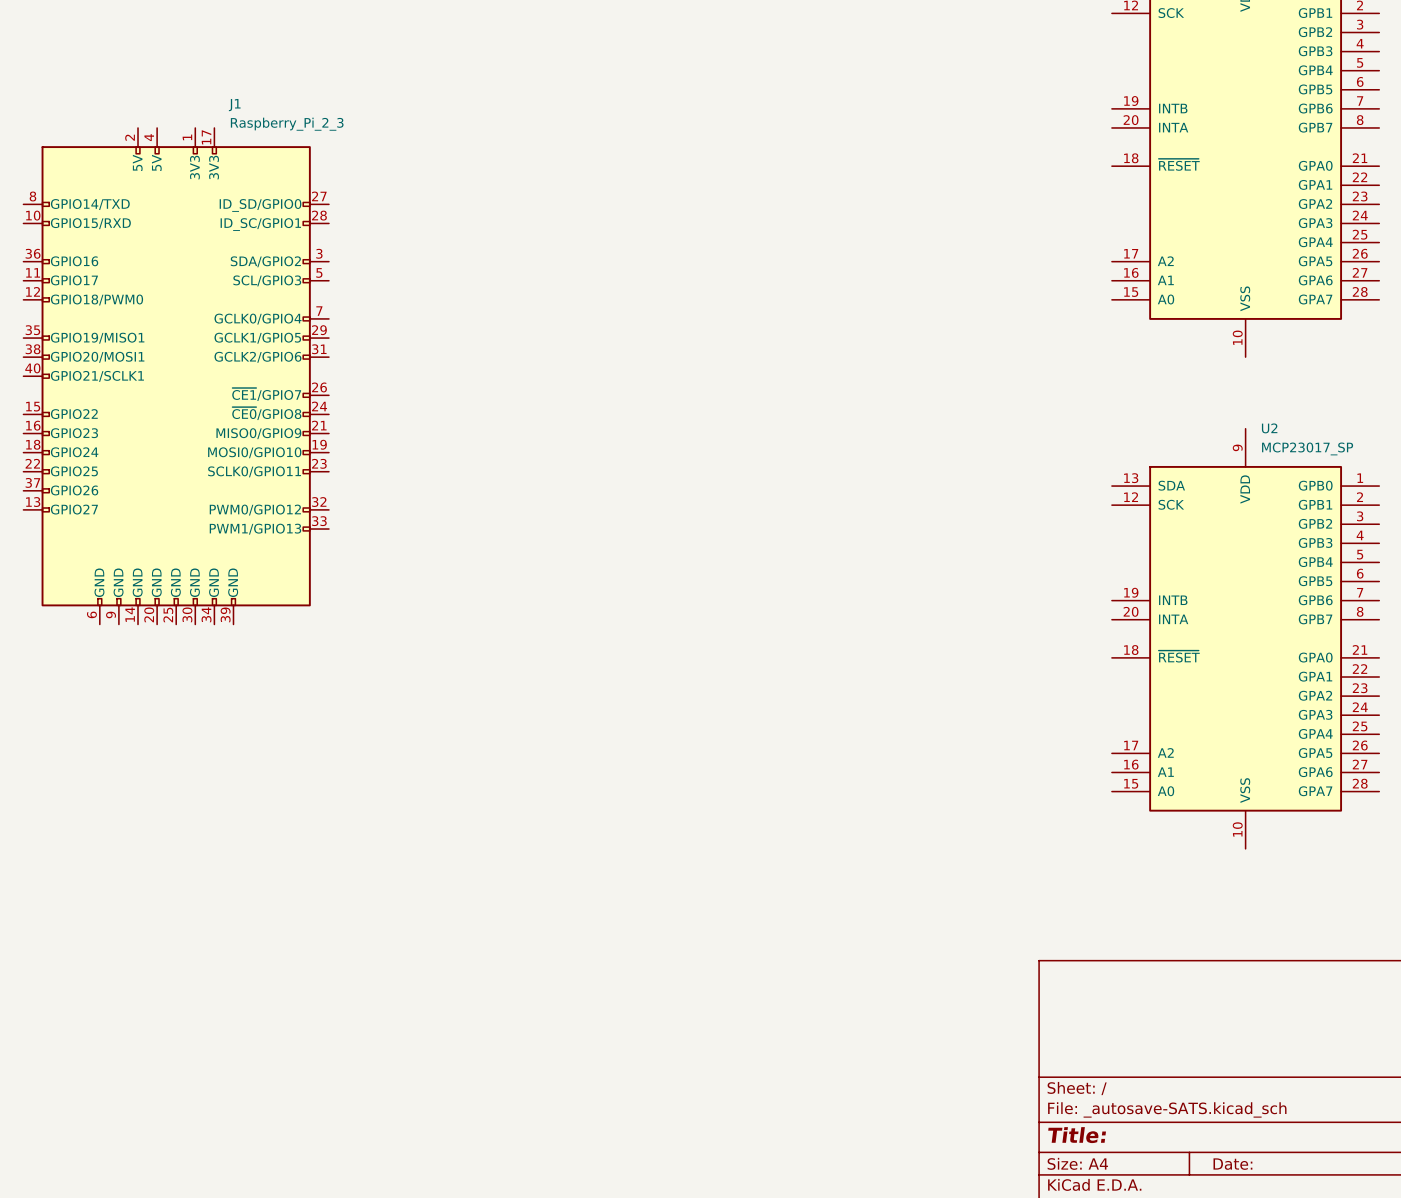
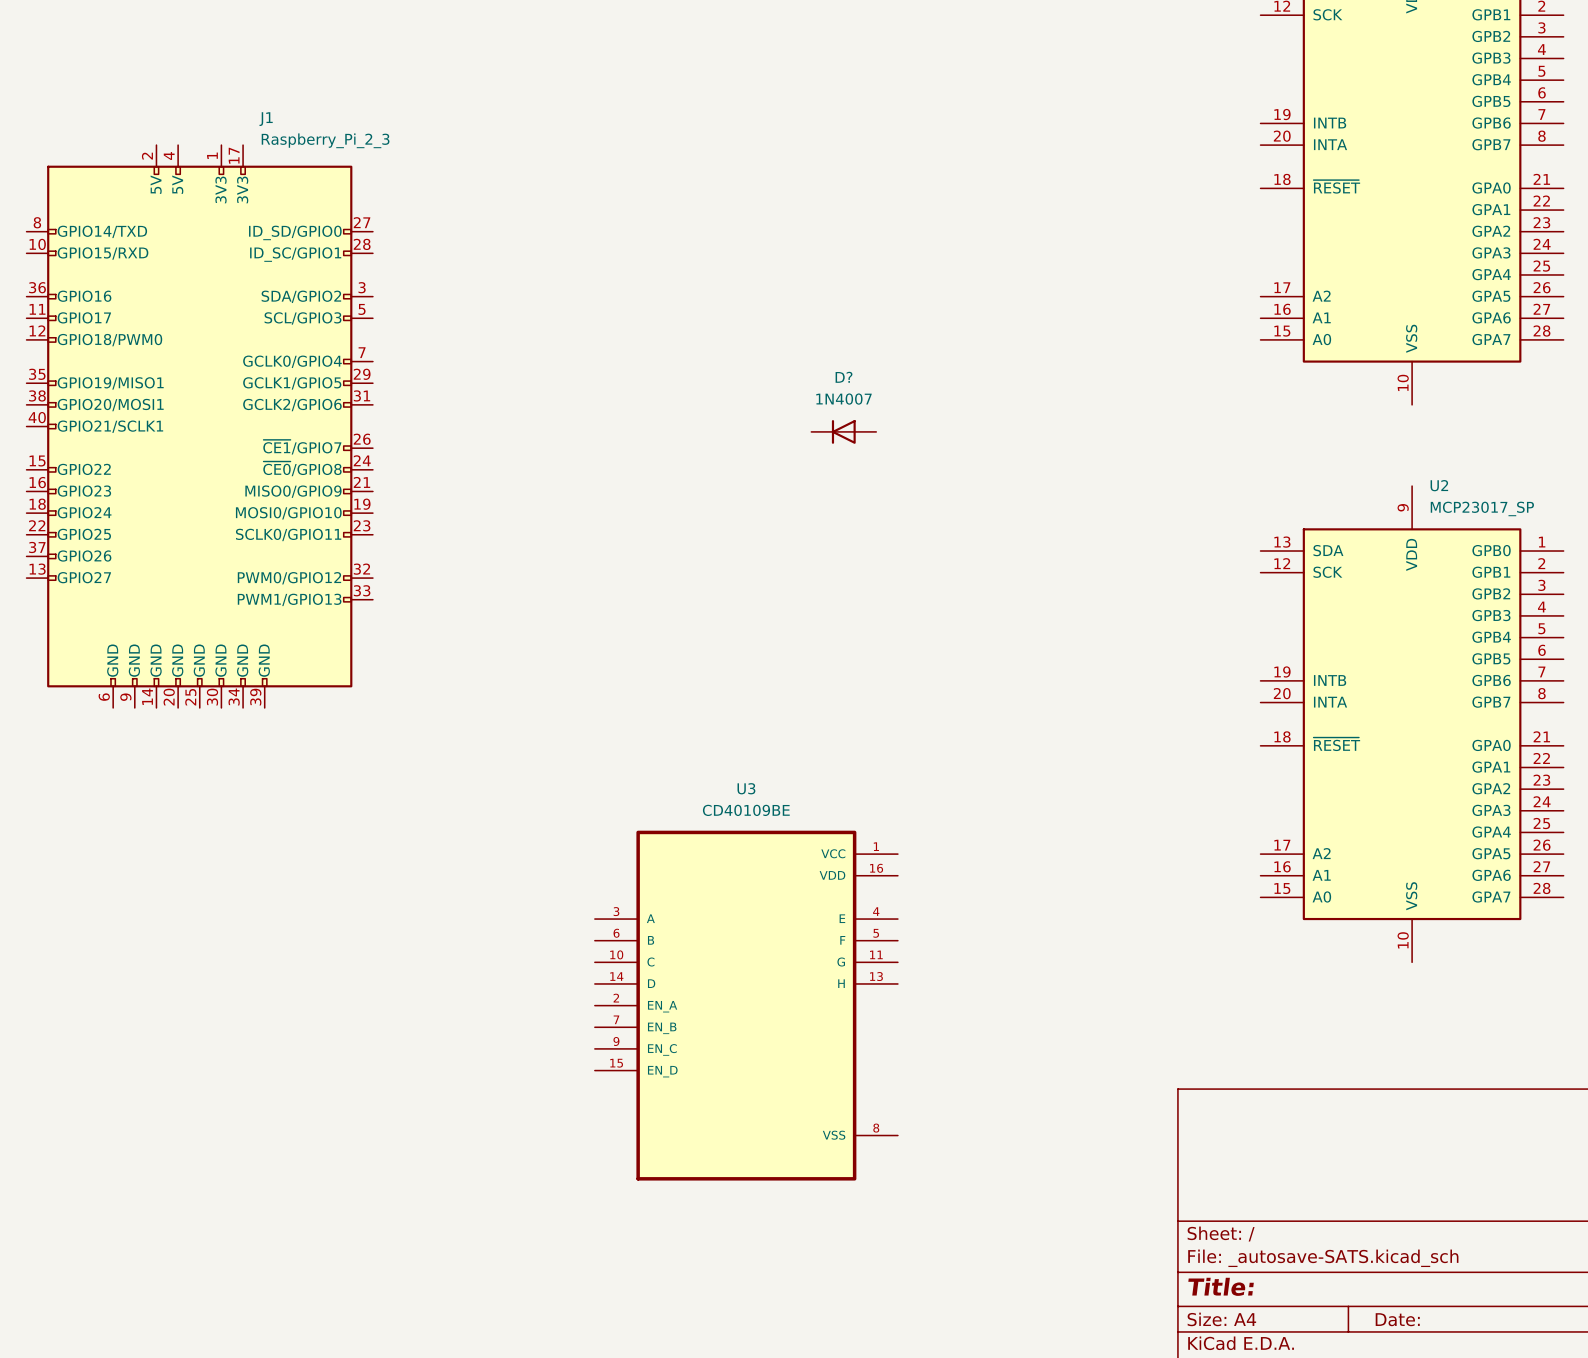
D?: none -> 1N4007 (843, 431)
U3: none -> CD40109BE (746, 1005)

